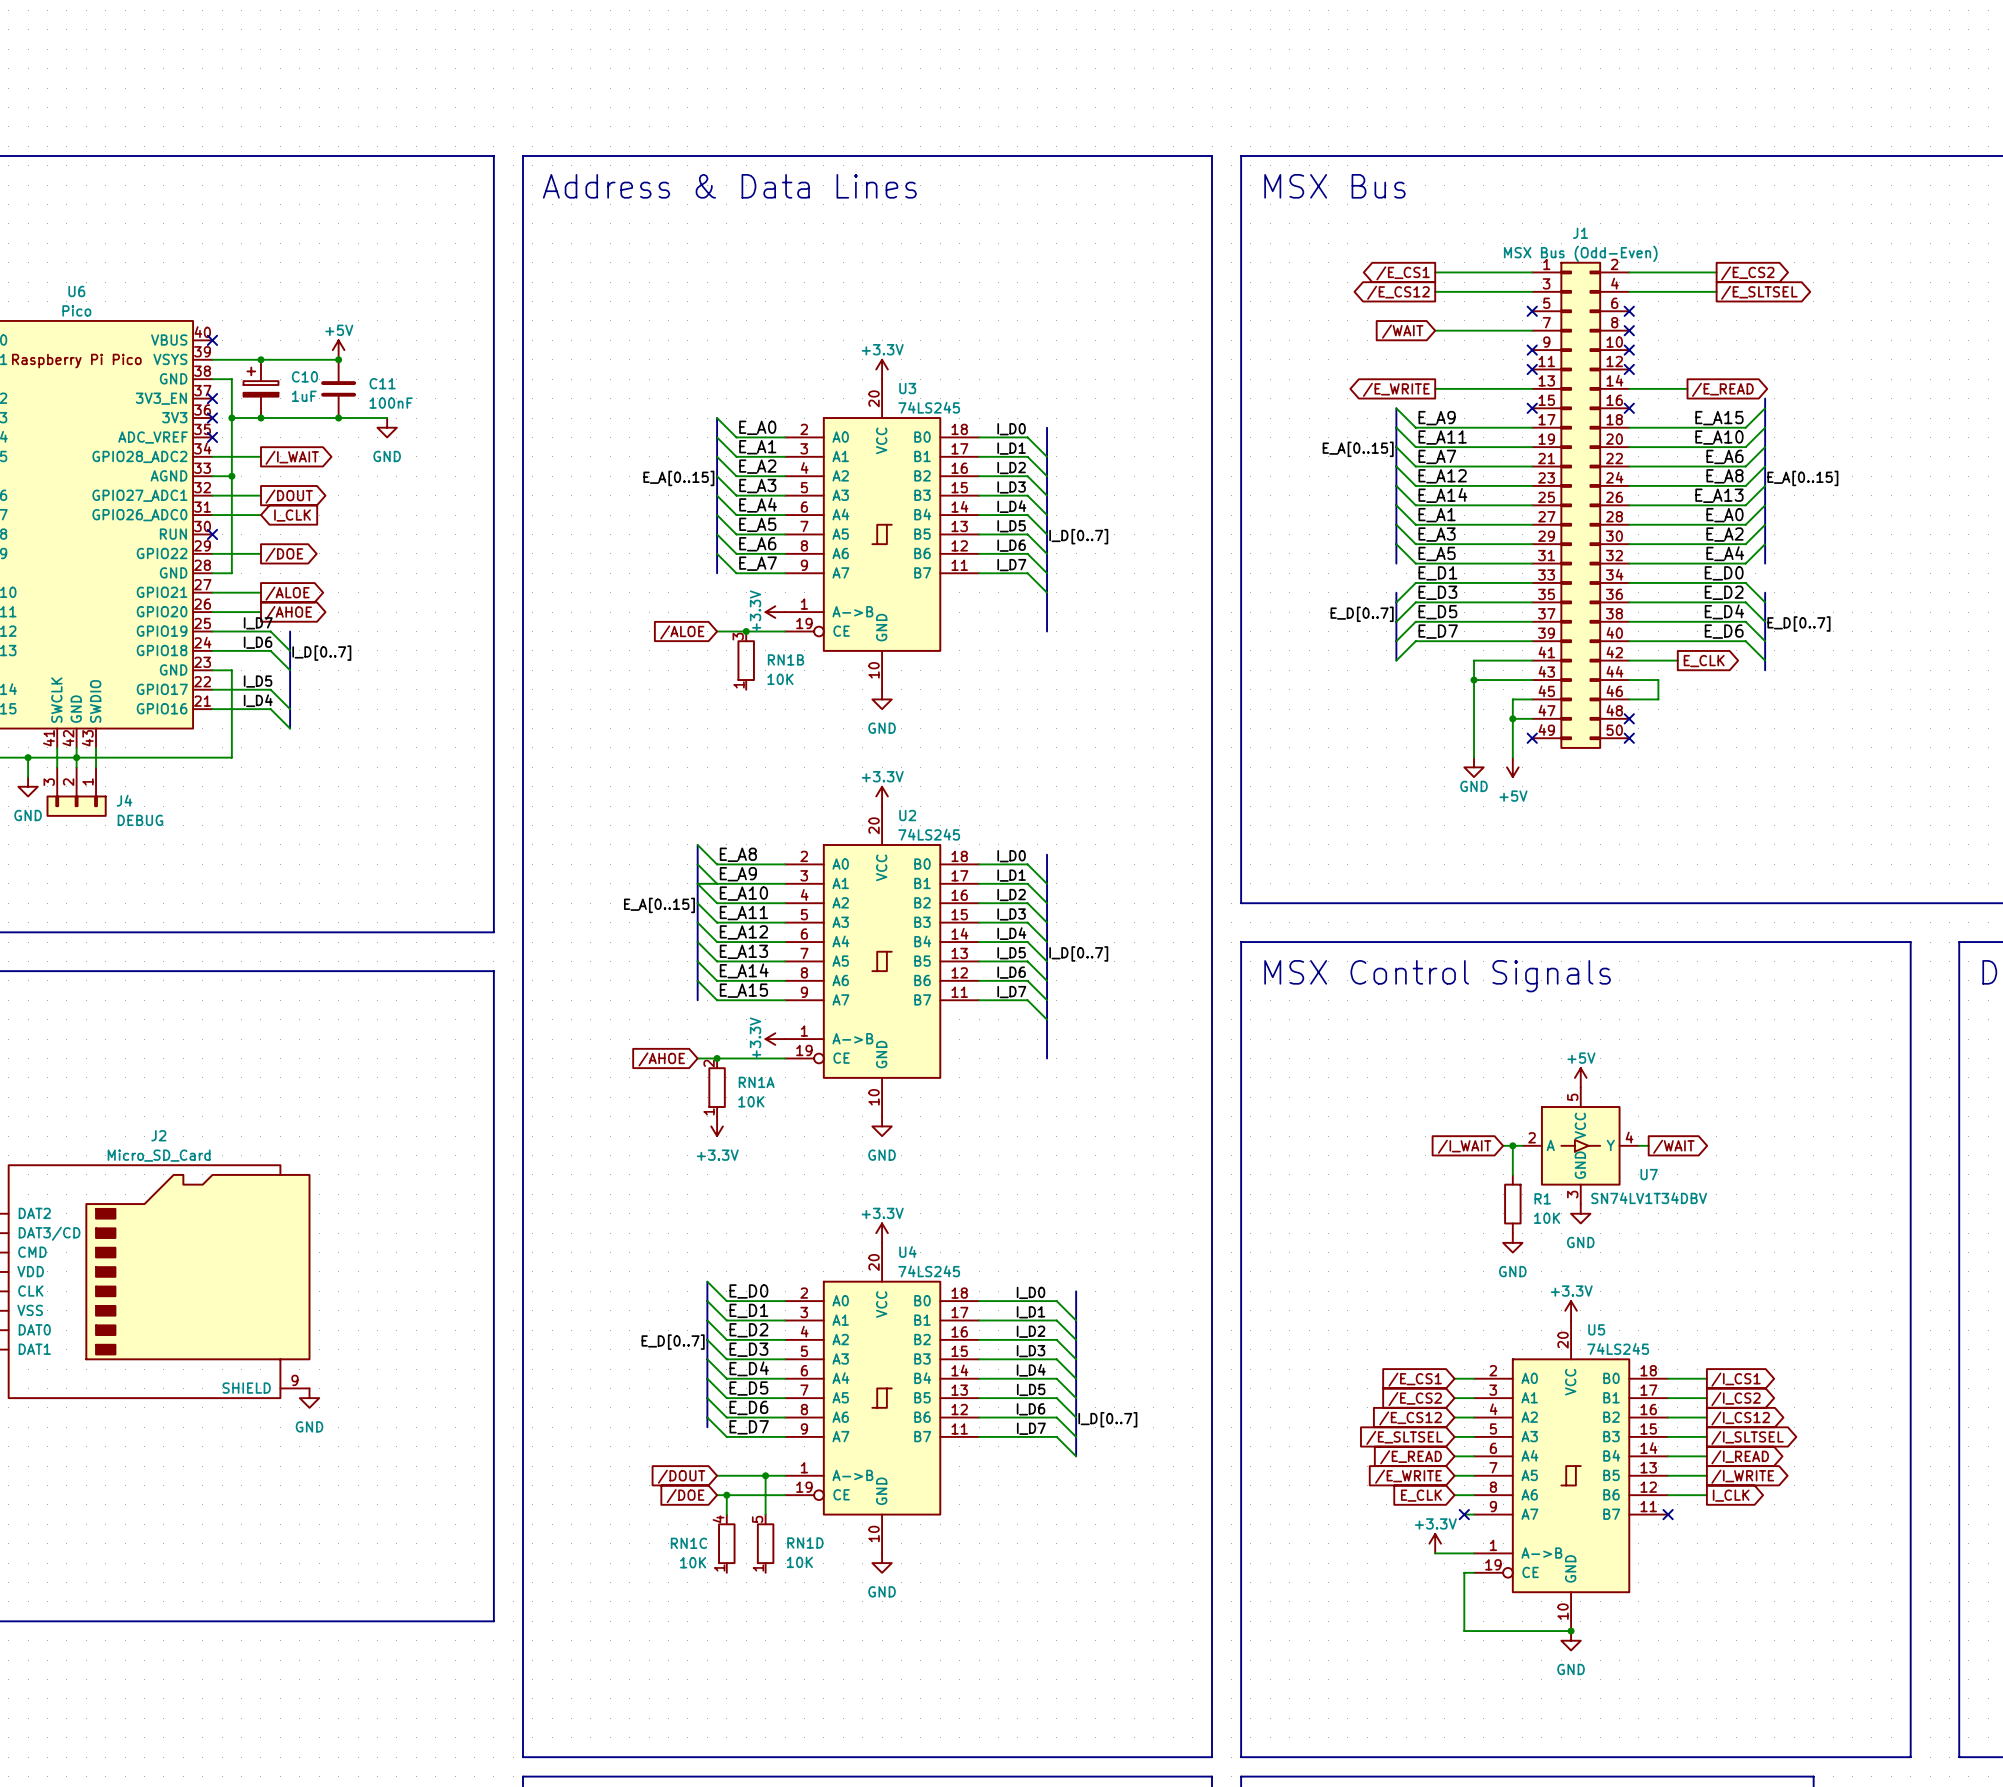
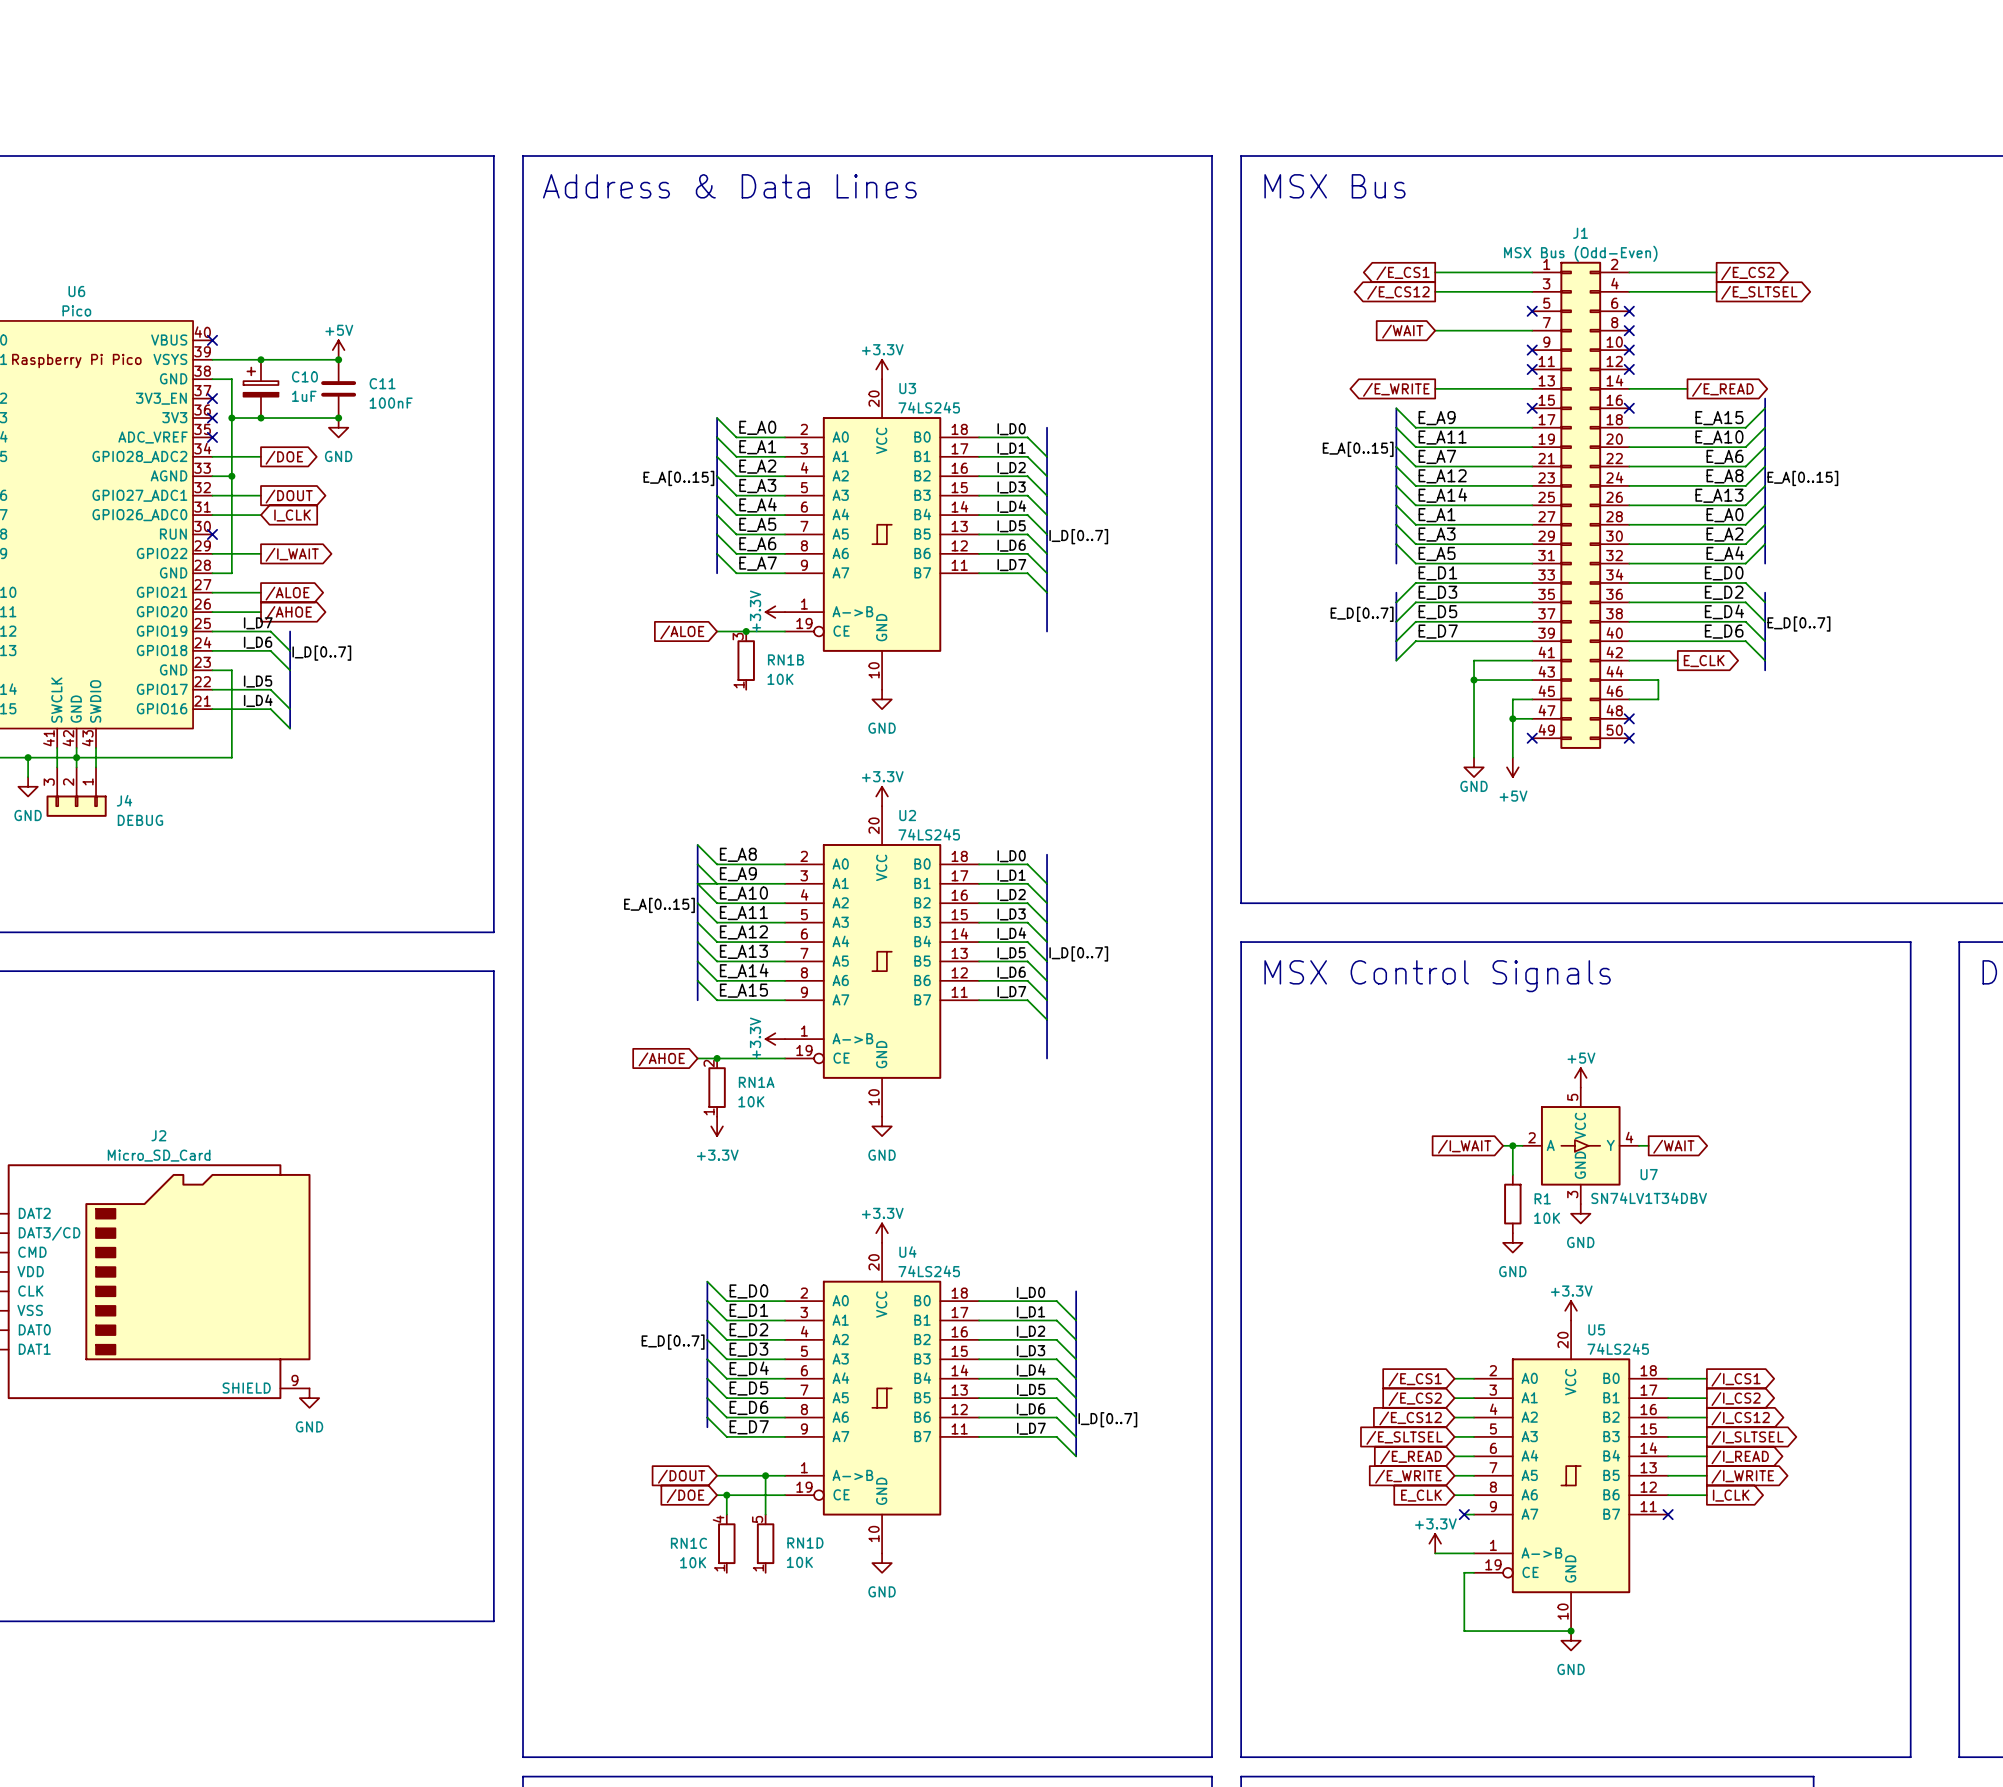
wire: (338, 418) (387, 418) -> none
power symbol position: GND (387, 427) -> GND (338, 427)
global label: /I_WAIT (292, 457) -> /DOE (284, 457)
global label: /DOE (284, 554) -> /I_WAIT (292, 554)

